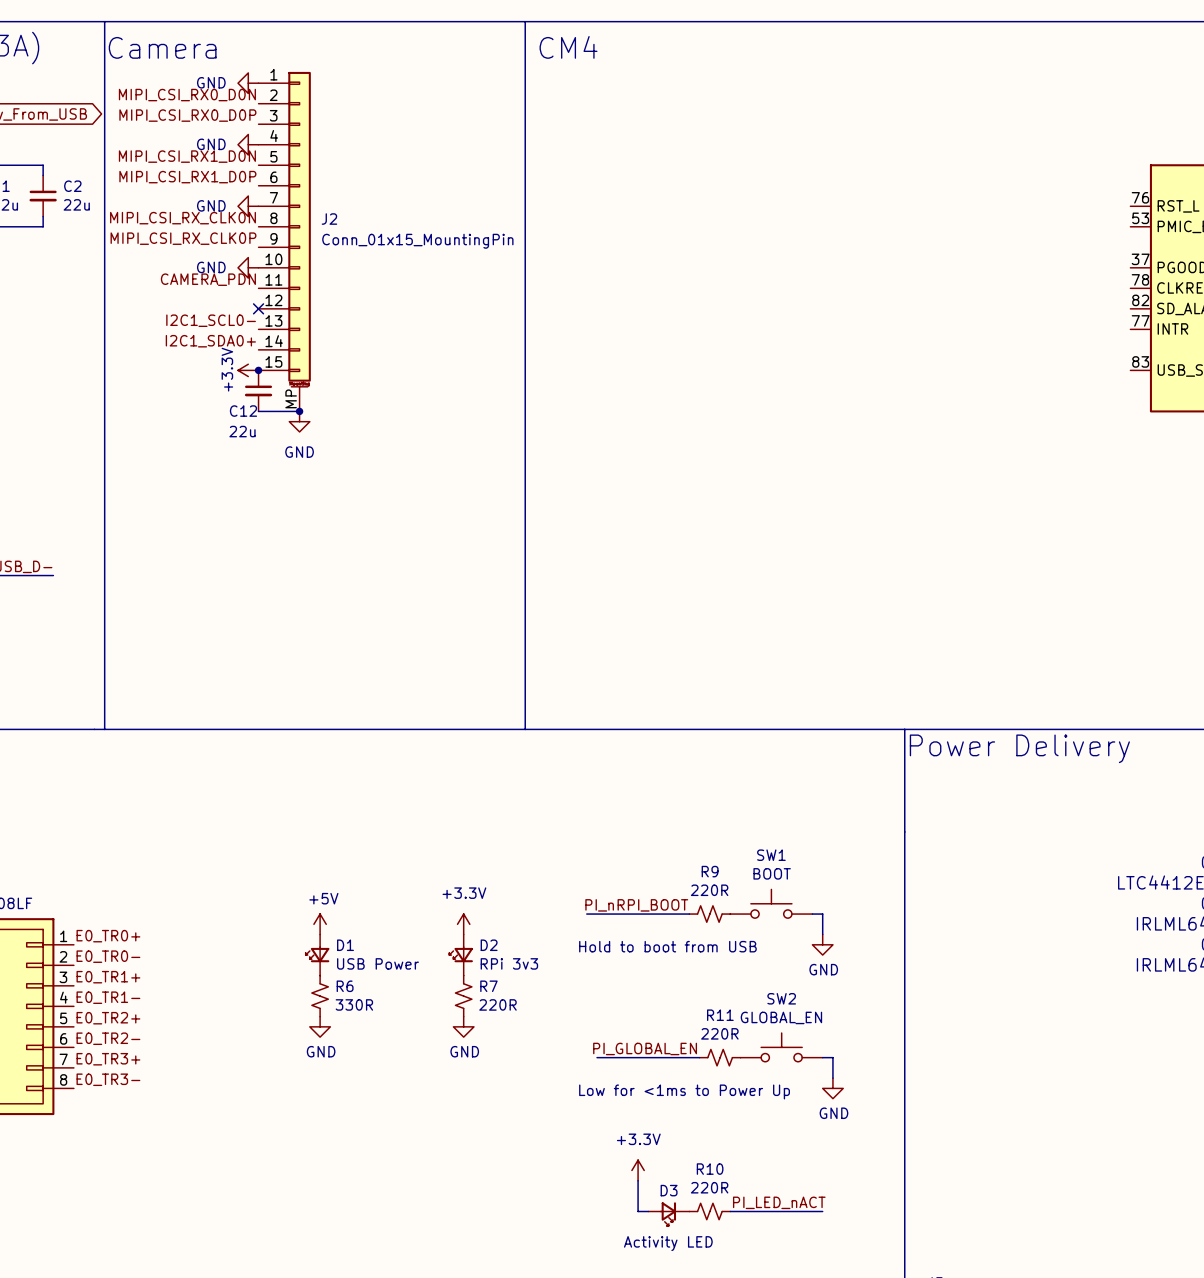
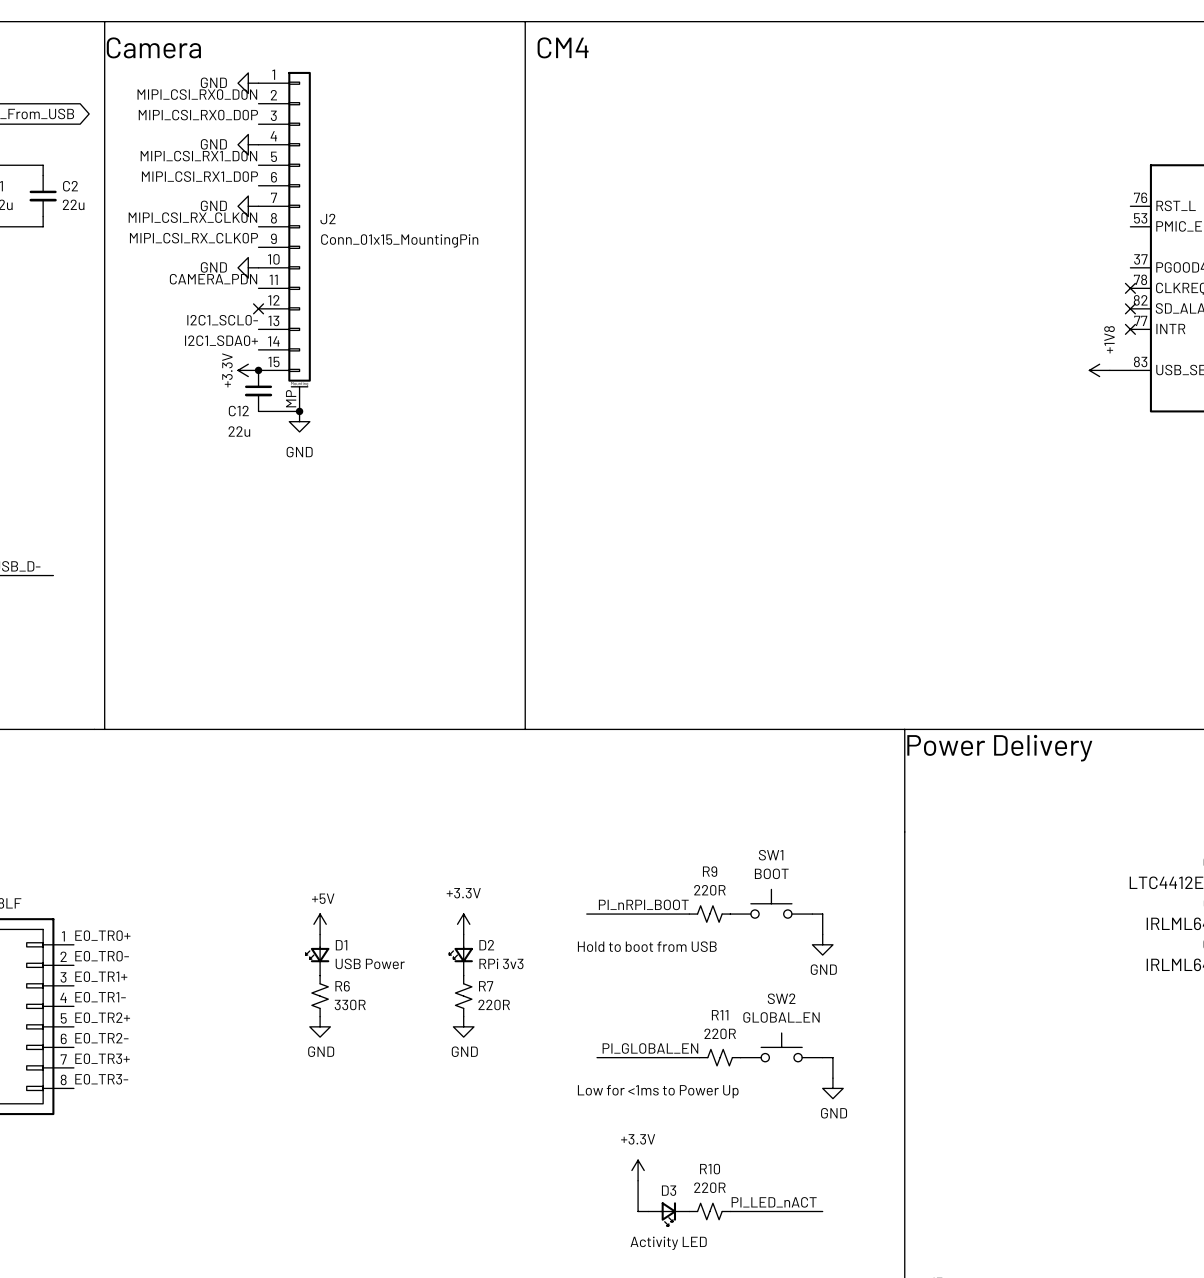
no-connect mark: none -> (1130, 288)
no-connect mark: none -> (1130, 308)
no-connect mark: none -> (1130, 329)
power symbol: none -> +1V8 (1099, 370)
wire: none -> (1109, 370) (1130, 370)

